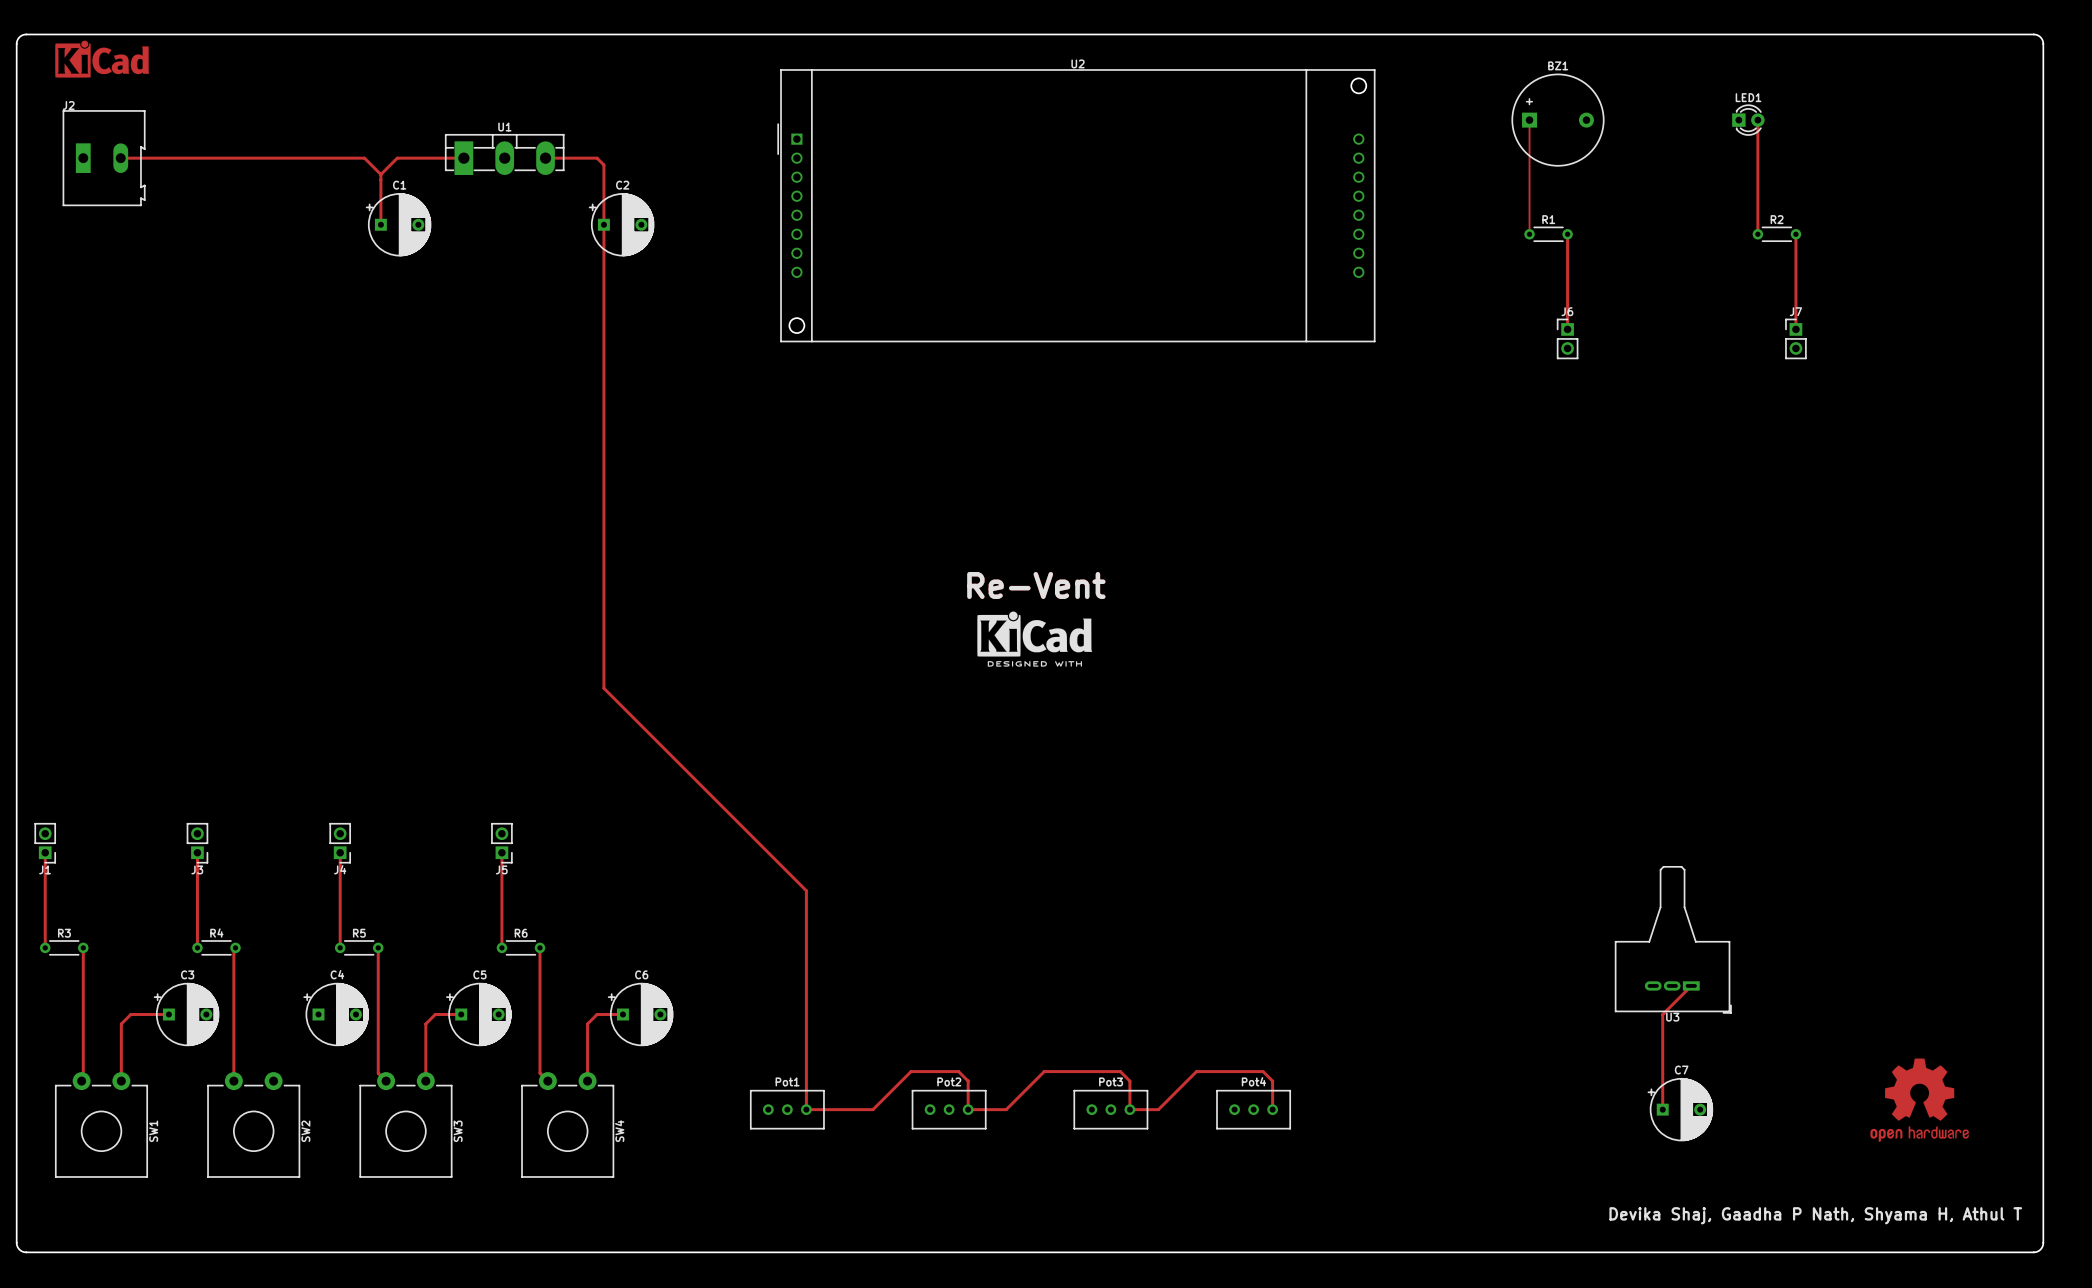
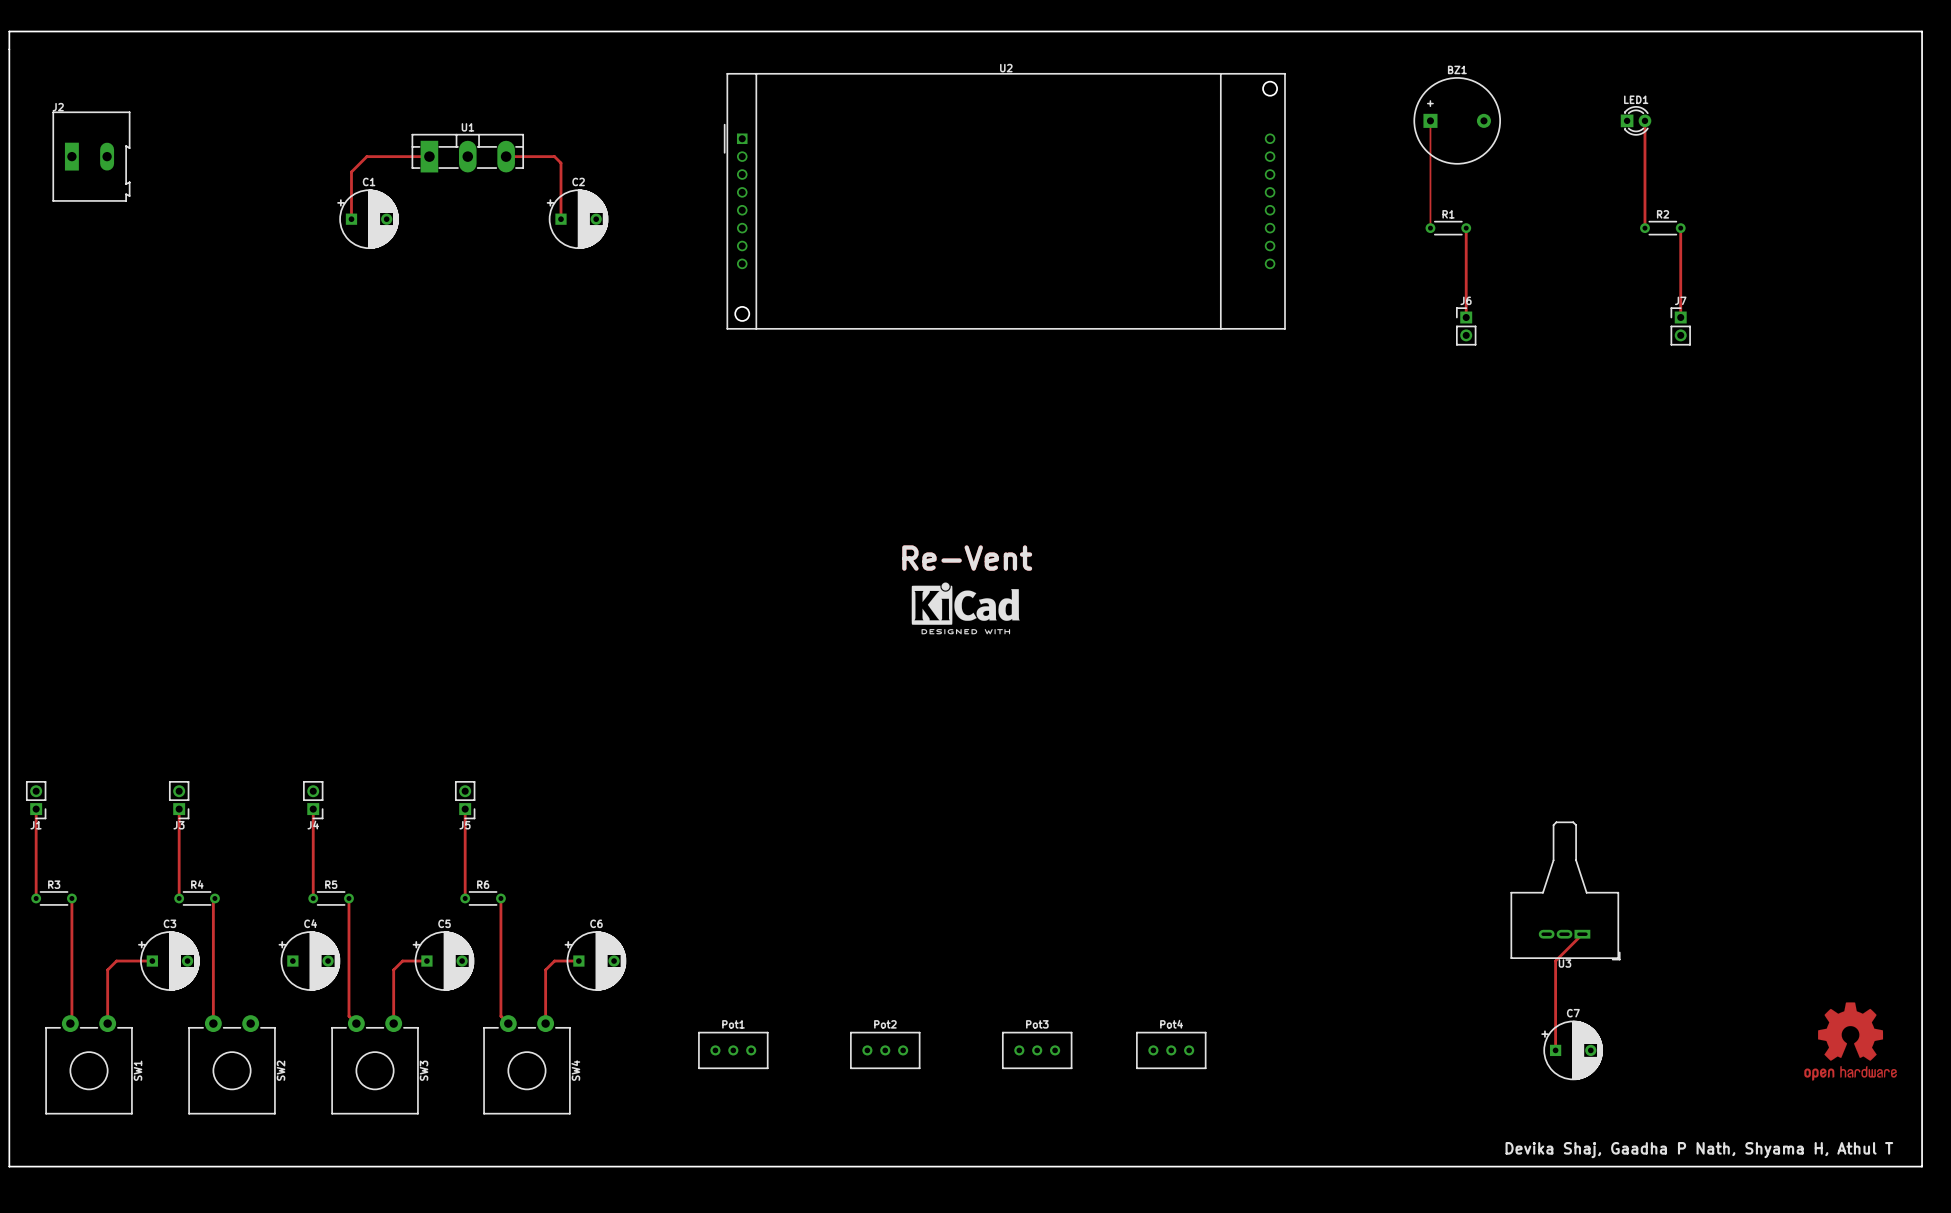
drawing: [55, 40, 150, 78] -> none
board edge: (16, 43) (19, 37) (26, 34) (2038, 35) (2043, 43) (2043, 1242) (2040, 1249) (2033, 1252) (26, 1252) (17, 1247) (16, 1233) -> (9, 49) (9, 31) (1922, 31) (1922, 1166) (9, 1166)
track: (120, 158) (364, 158) (380, 174) -> none
track: (603, 224) (603, 688) (806, 890) (806, 1109) (873, 1109) (911, 1071) (958, 1071) (968, 1081) (968, 1109) (1006, 1109) (1044, 1071) (1120, 1071) (1129, 1081) (1129, 1109) (1158, 1109) (1196, 1071) (1263, 1071) (1272, 1081) (1272, 1109) -> none
drawing position: (1919, 1100) -> (1850, 1041)

